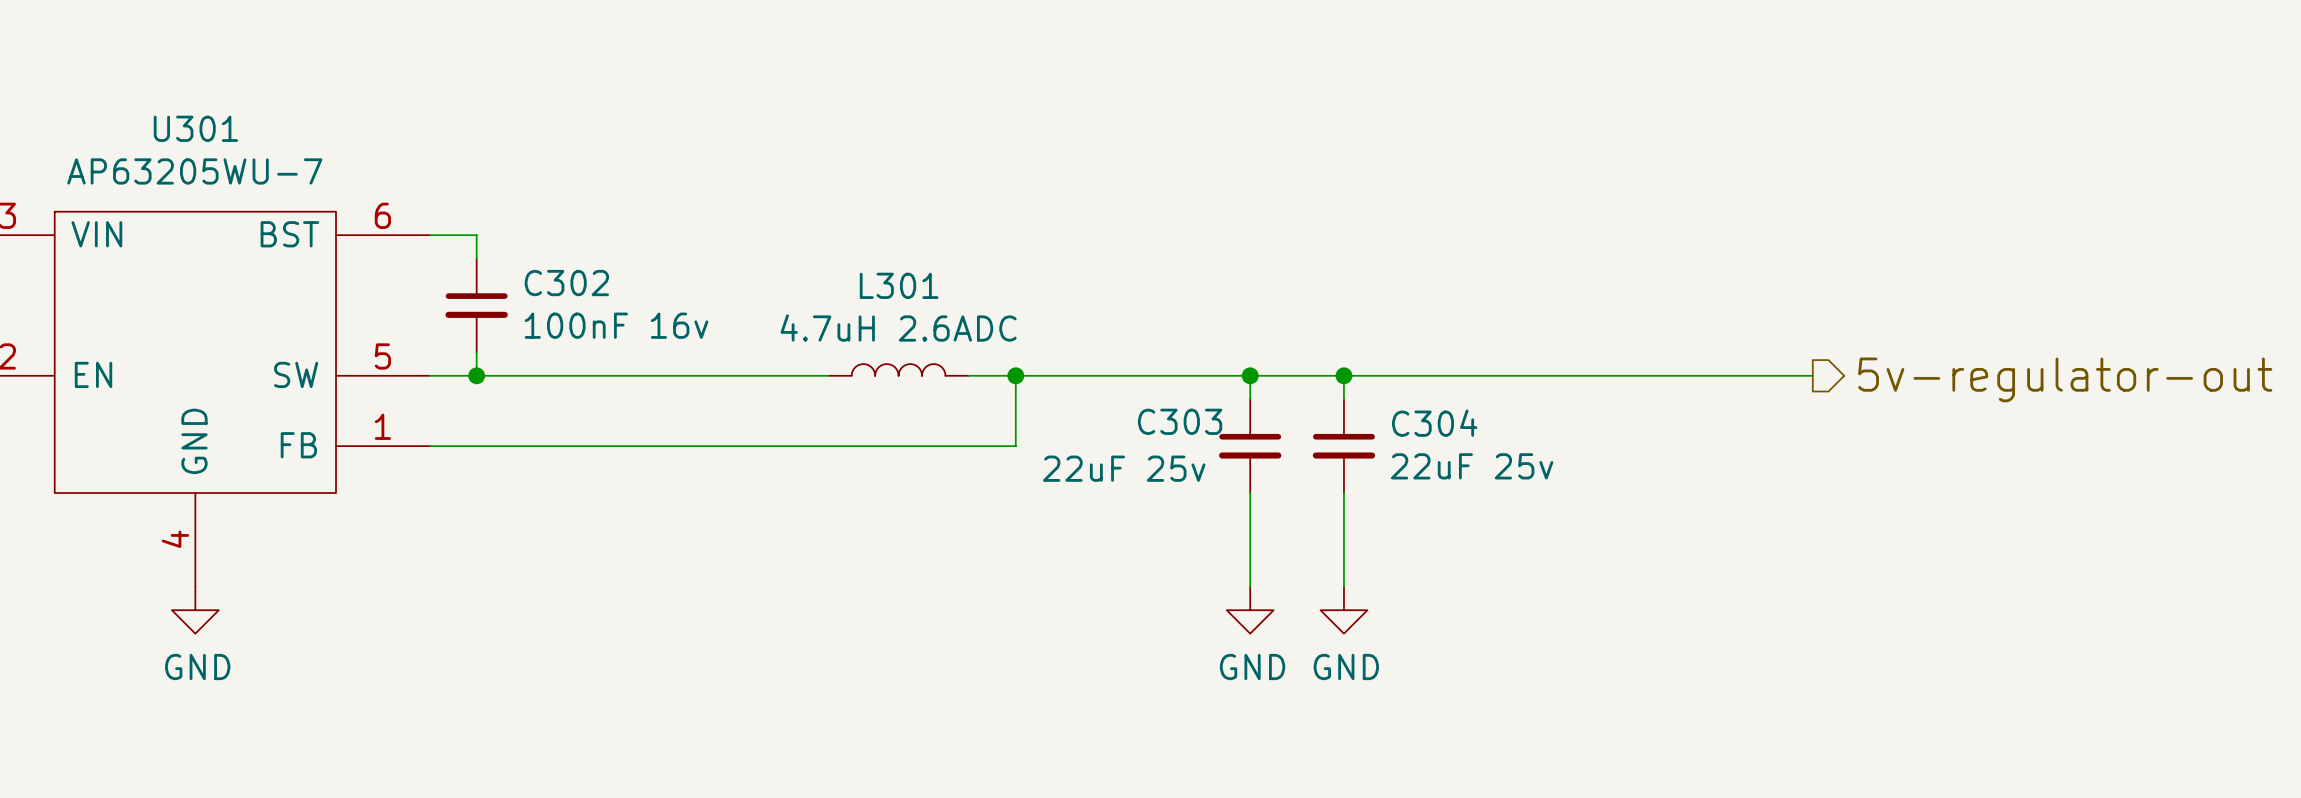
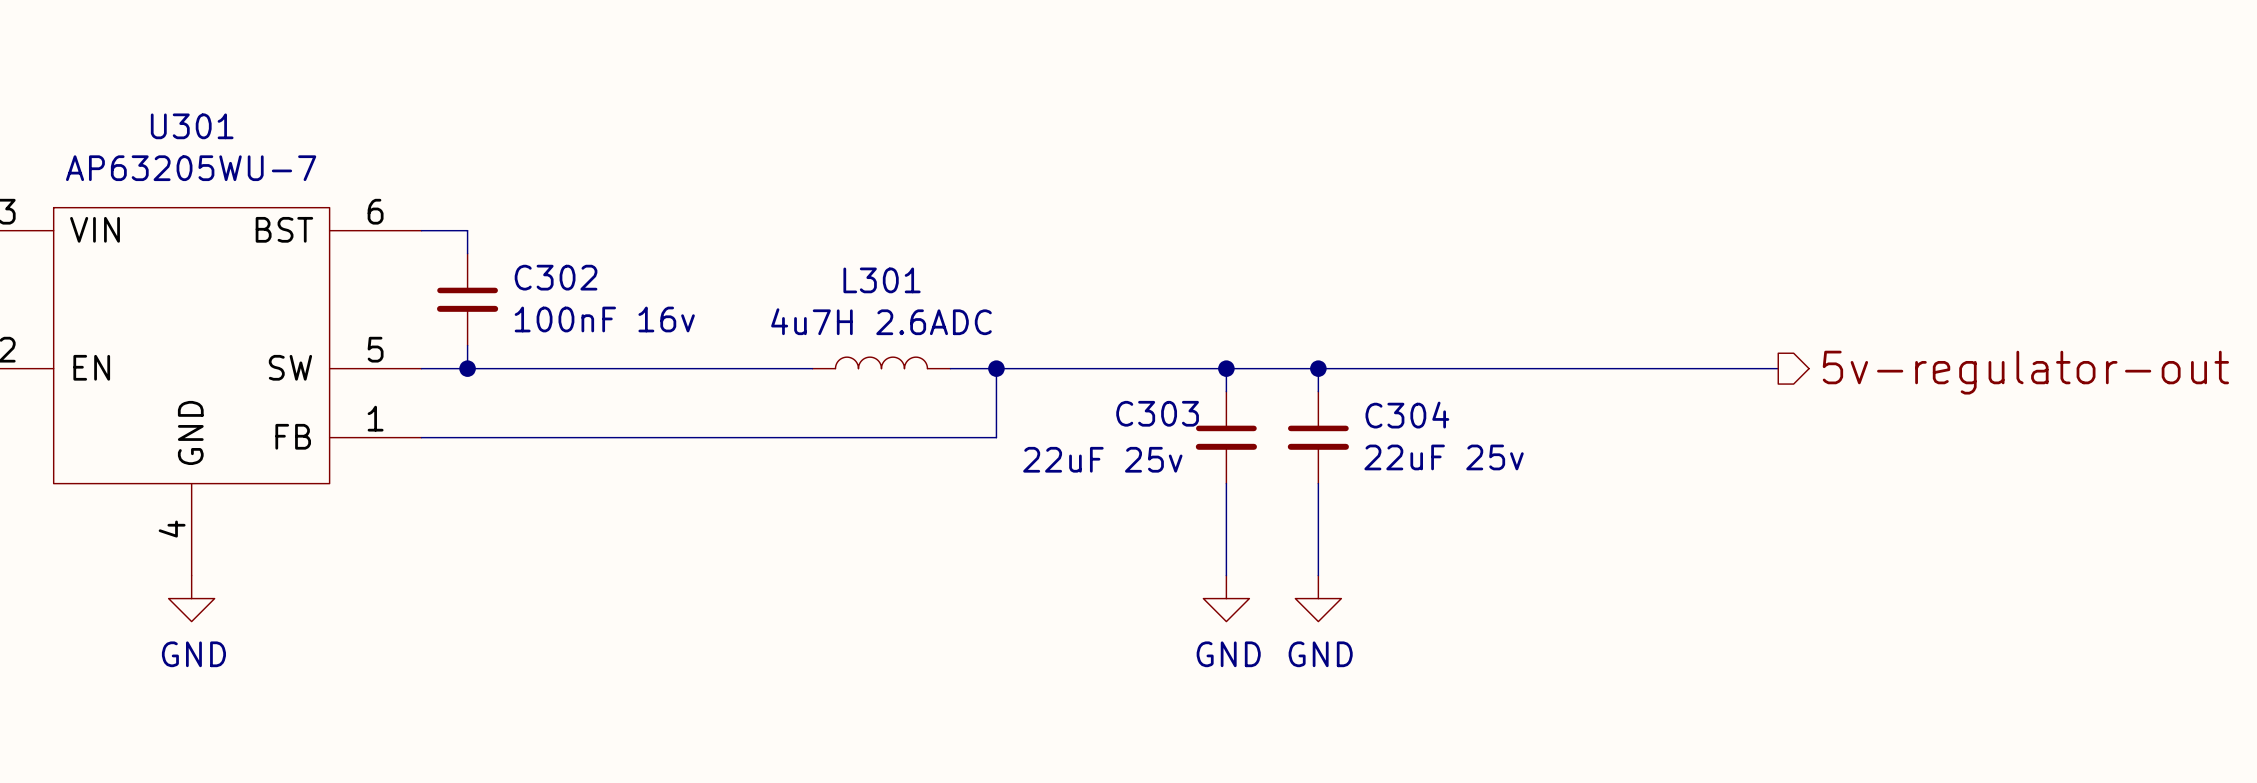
L301 value: 4.7uH 2.6ADC (898, 327) -> 4u7H 2.6ADC (881, 321)

